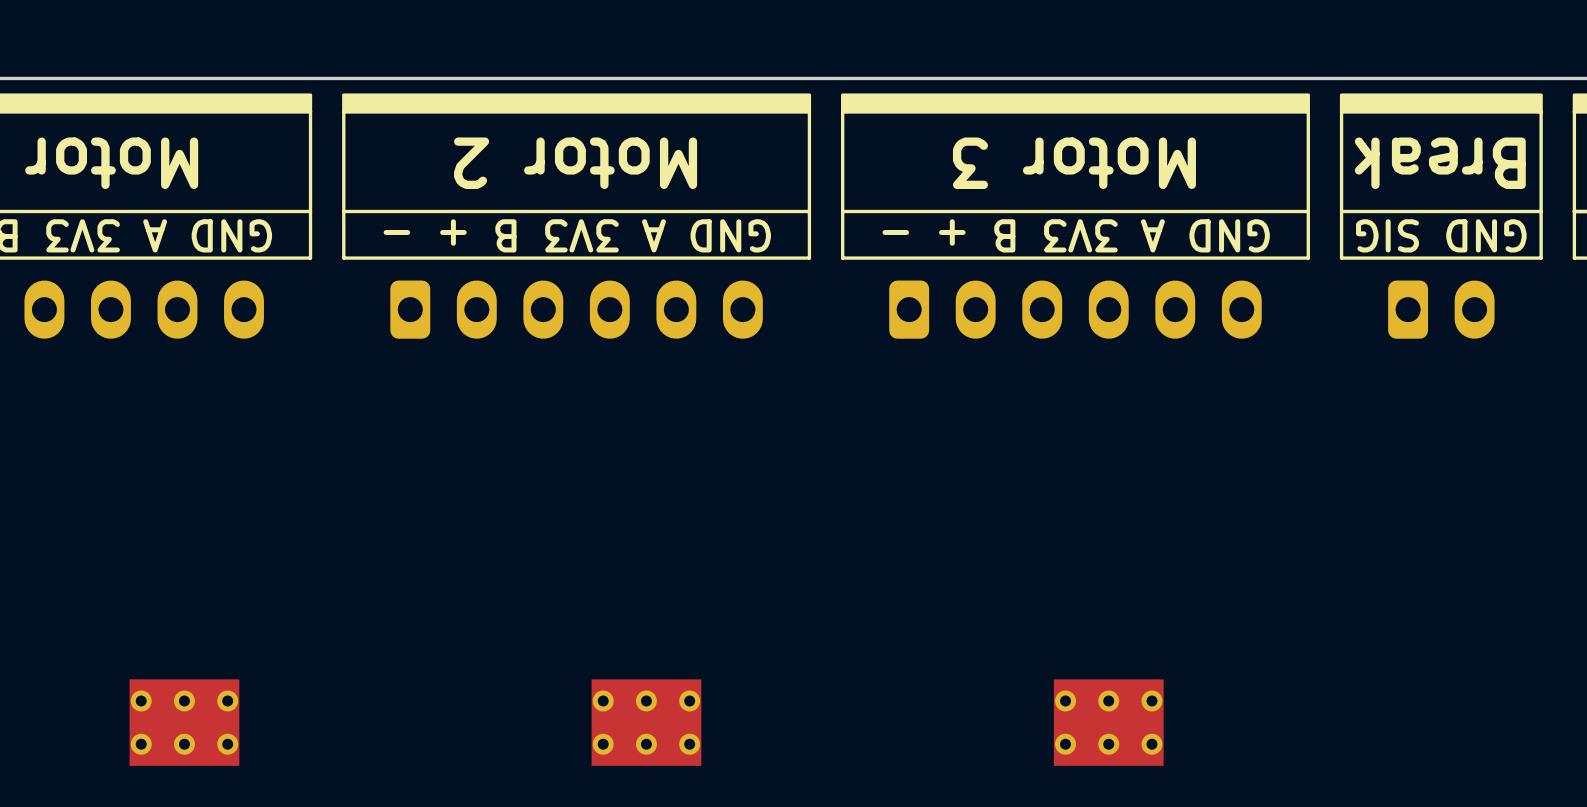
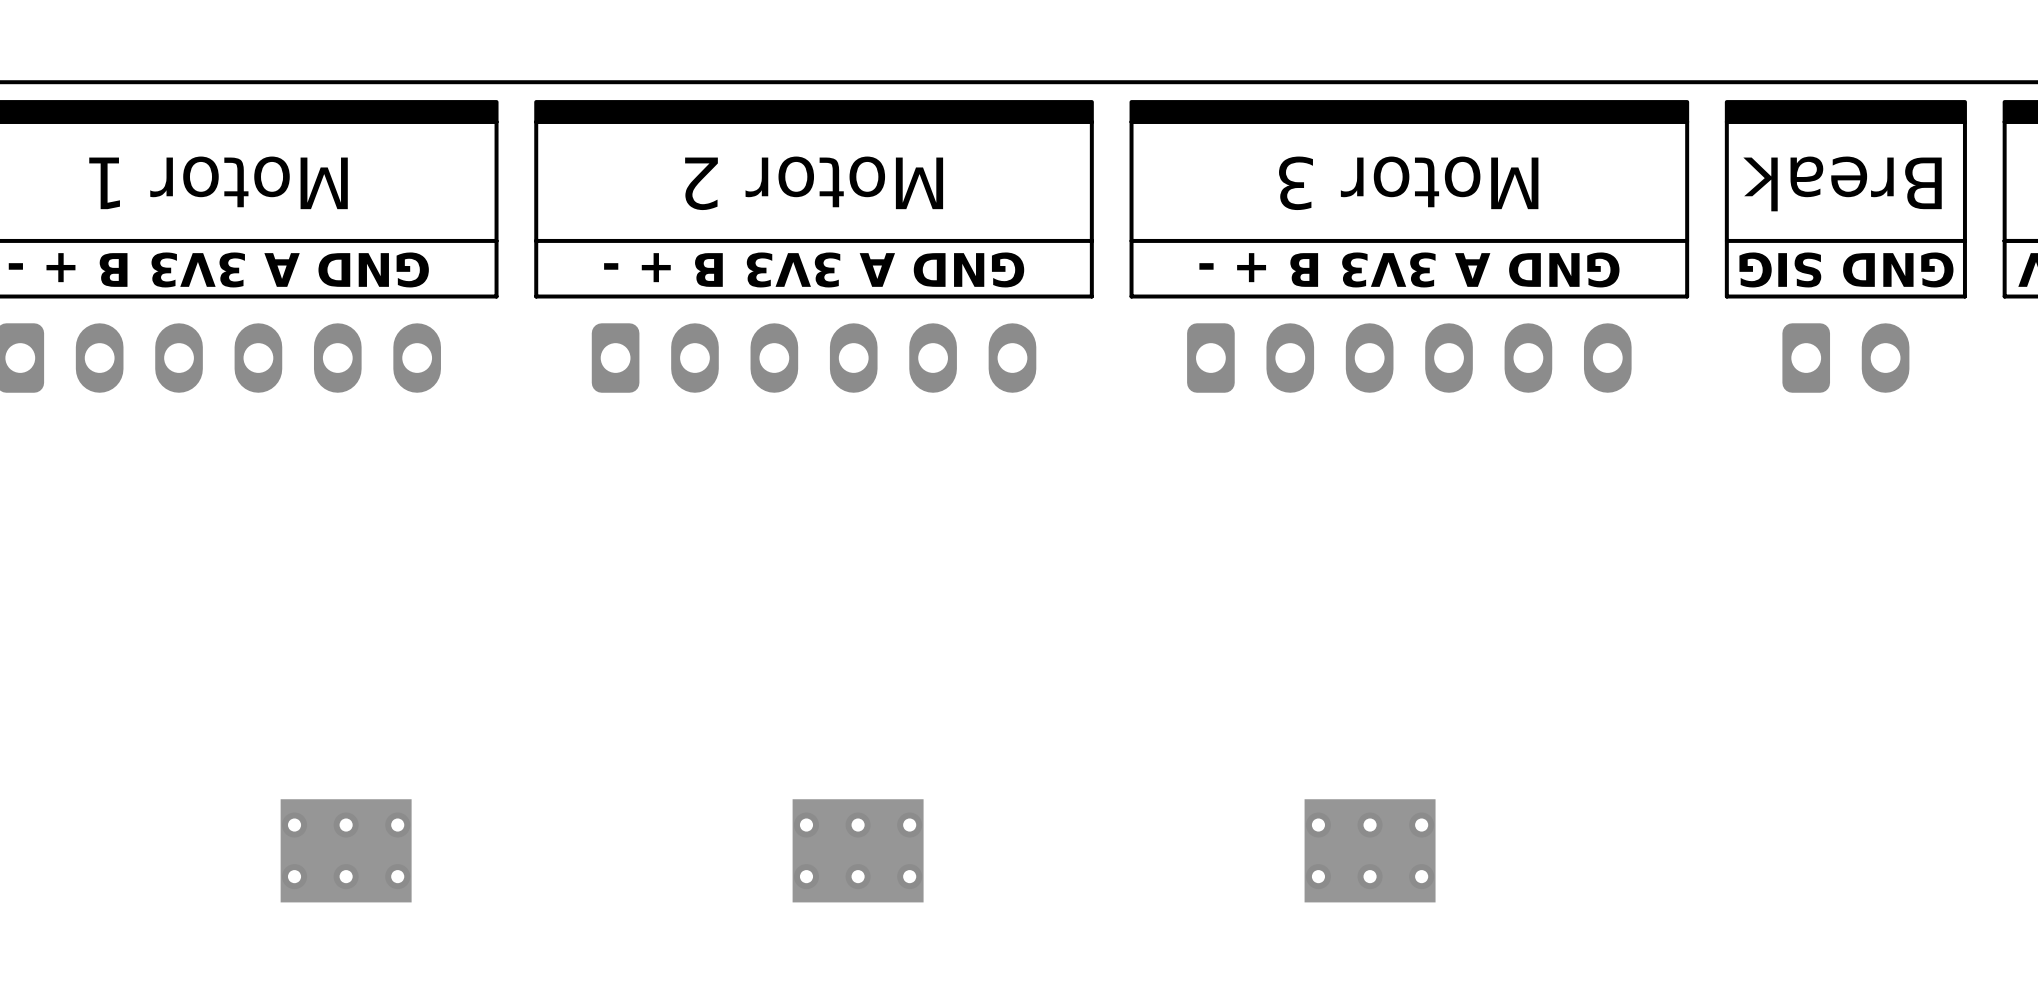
part position: (646, 722) -> (858, 850)
part position: (1108, 722) -> (1370, 850)

